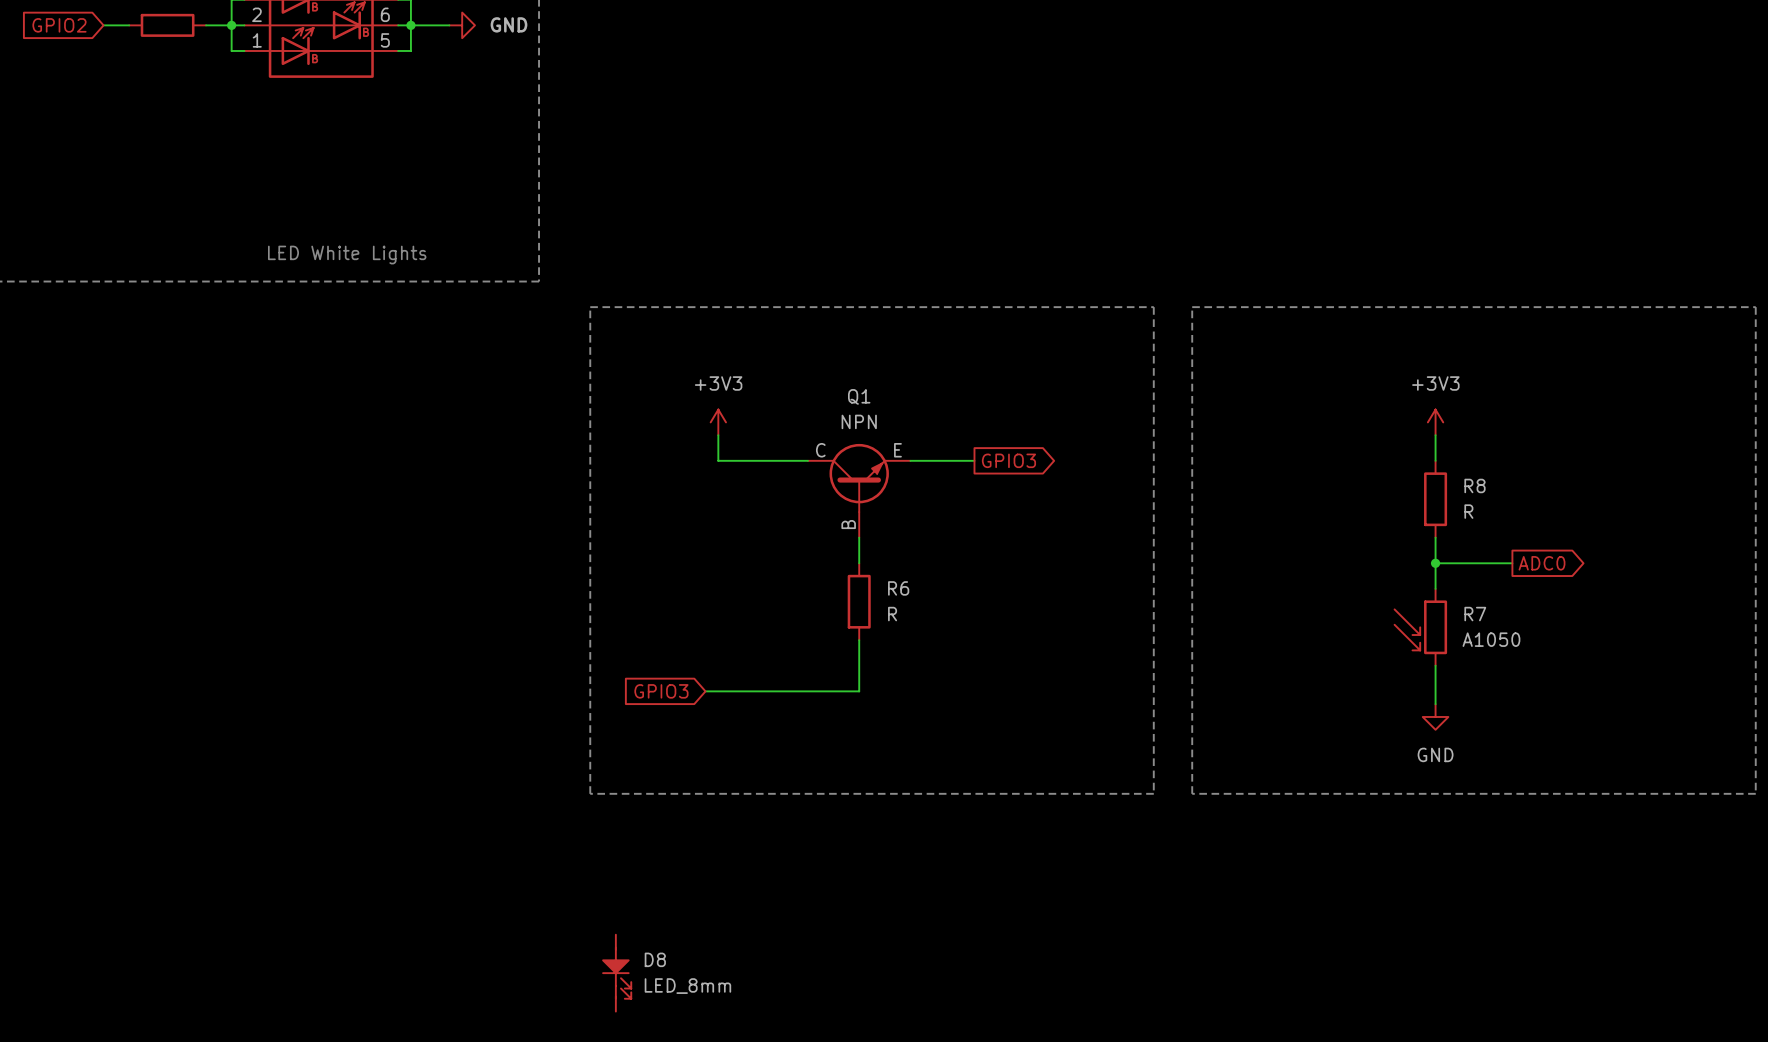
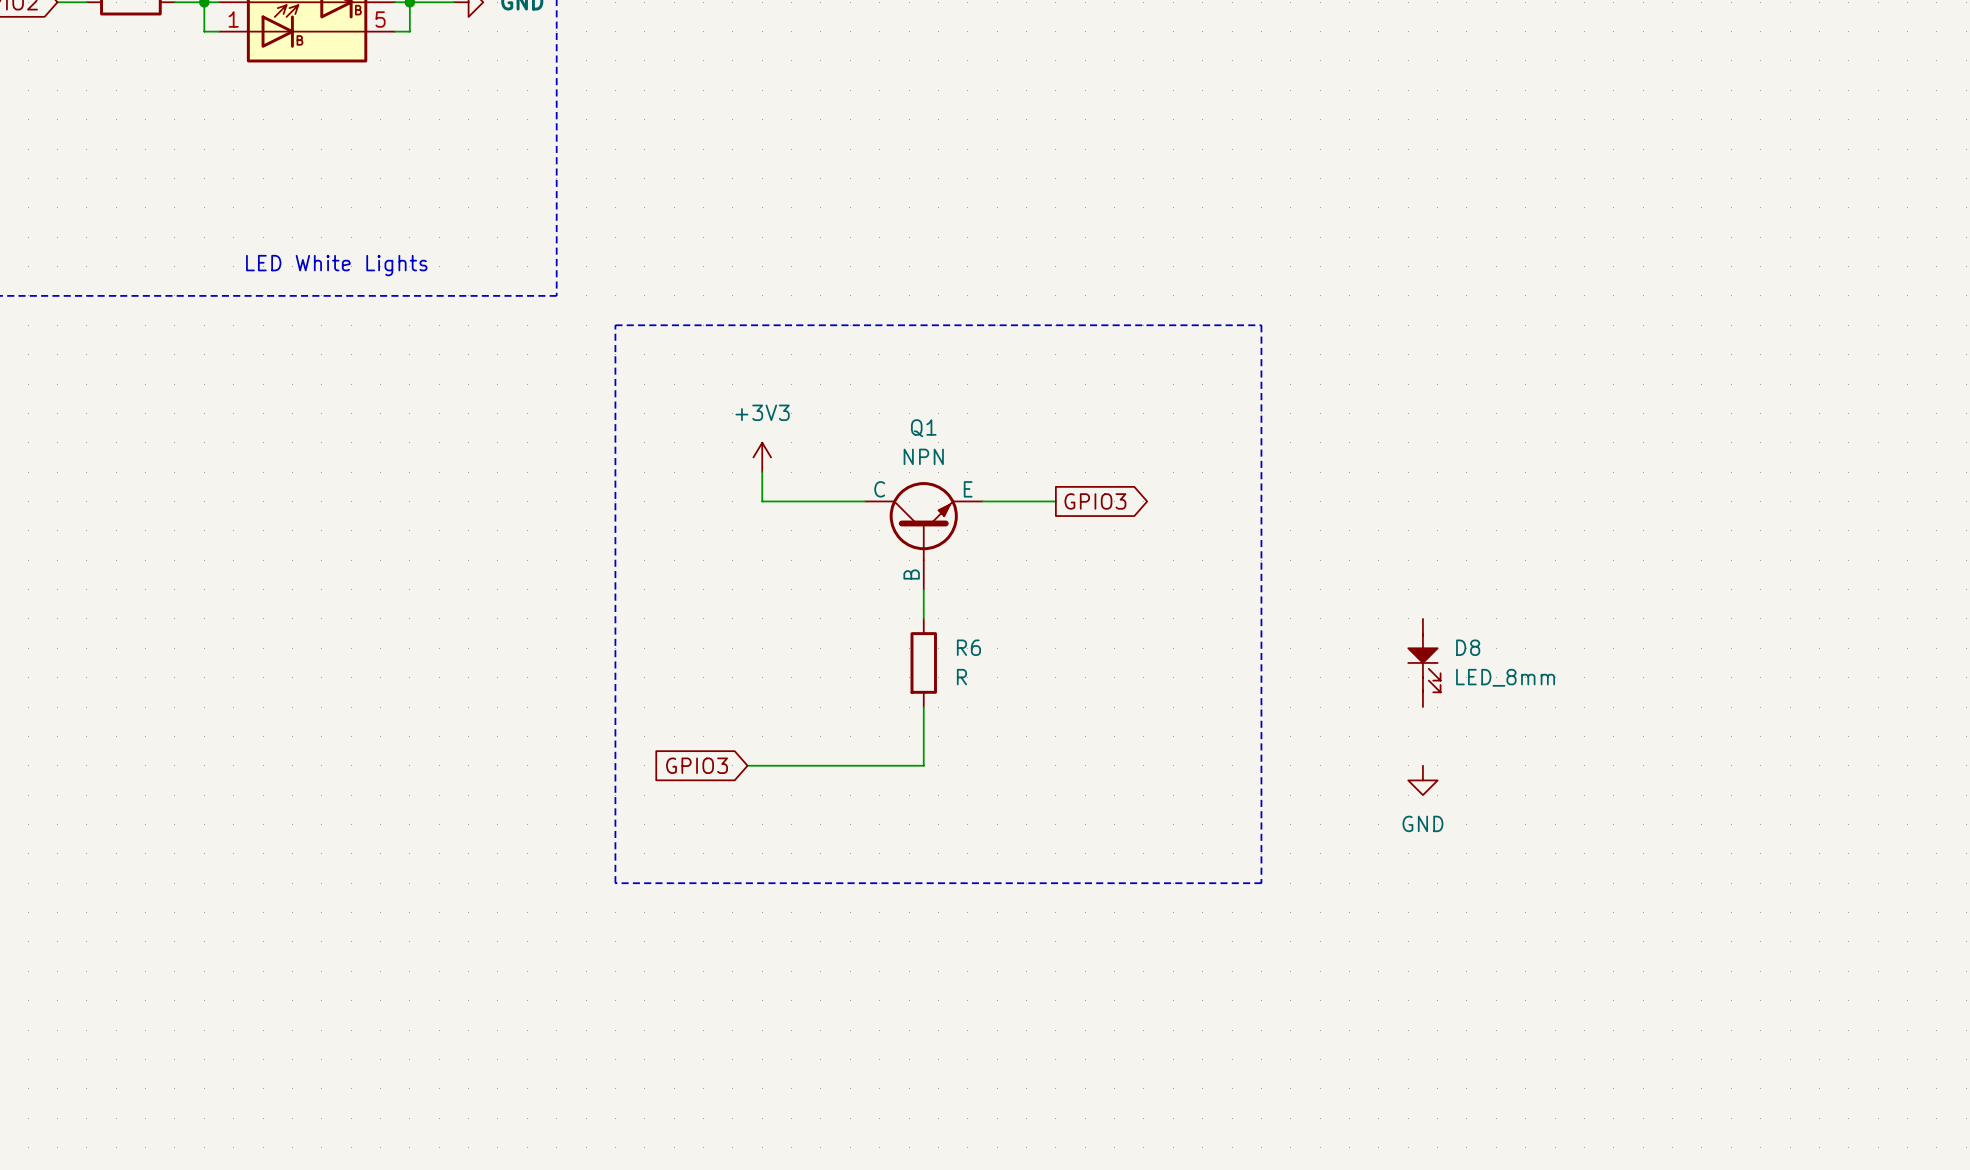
line: (1192, 307) (1755, 307) (1755, 793) (1192, 793) (1192, 307) -> none
power symbol: +3V3 (1435, 422) -> none
wire: (1435, 435) (1435, 460) -> none
R8: R (1435, 499) -> none
wire: (1435, 537) (1435, 588) -> none
wire: (1435, 563) (1512, 563) -> none
junction: (1435, 563) -> none
global label: ADC0 (1542, 563) -> none
R7: A1050 (1420, 627) -> none
wire: (1435, 665) (1435, 704) -> none
power symbol position: GND (1435, 716) -> GND (1422, 780)
D8 position: (617, 973) -> (1424, 662)

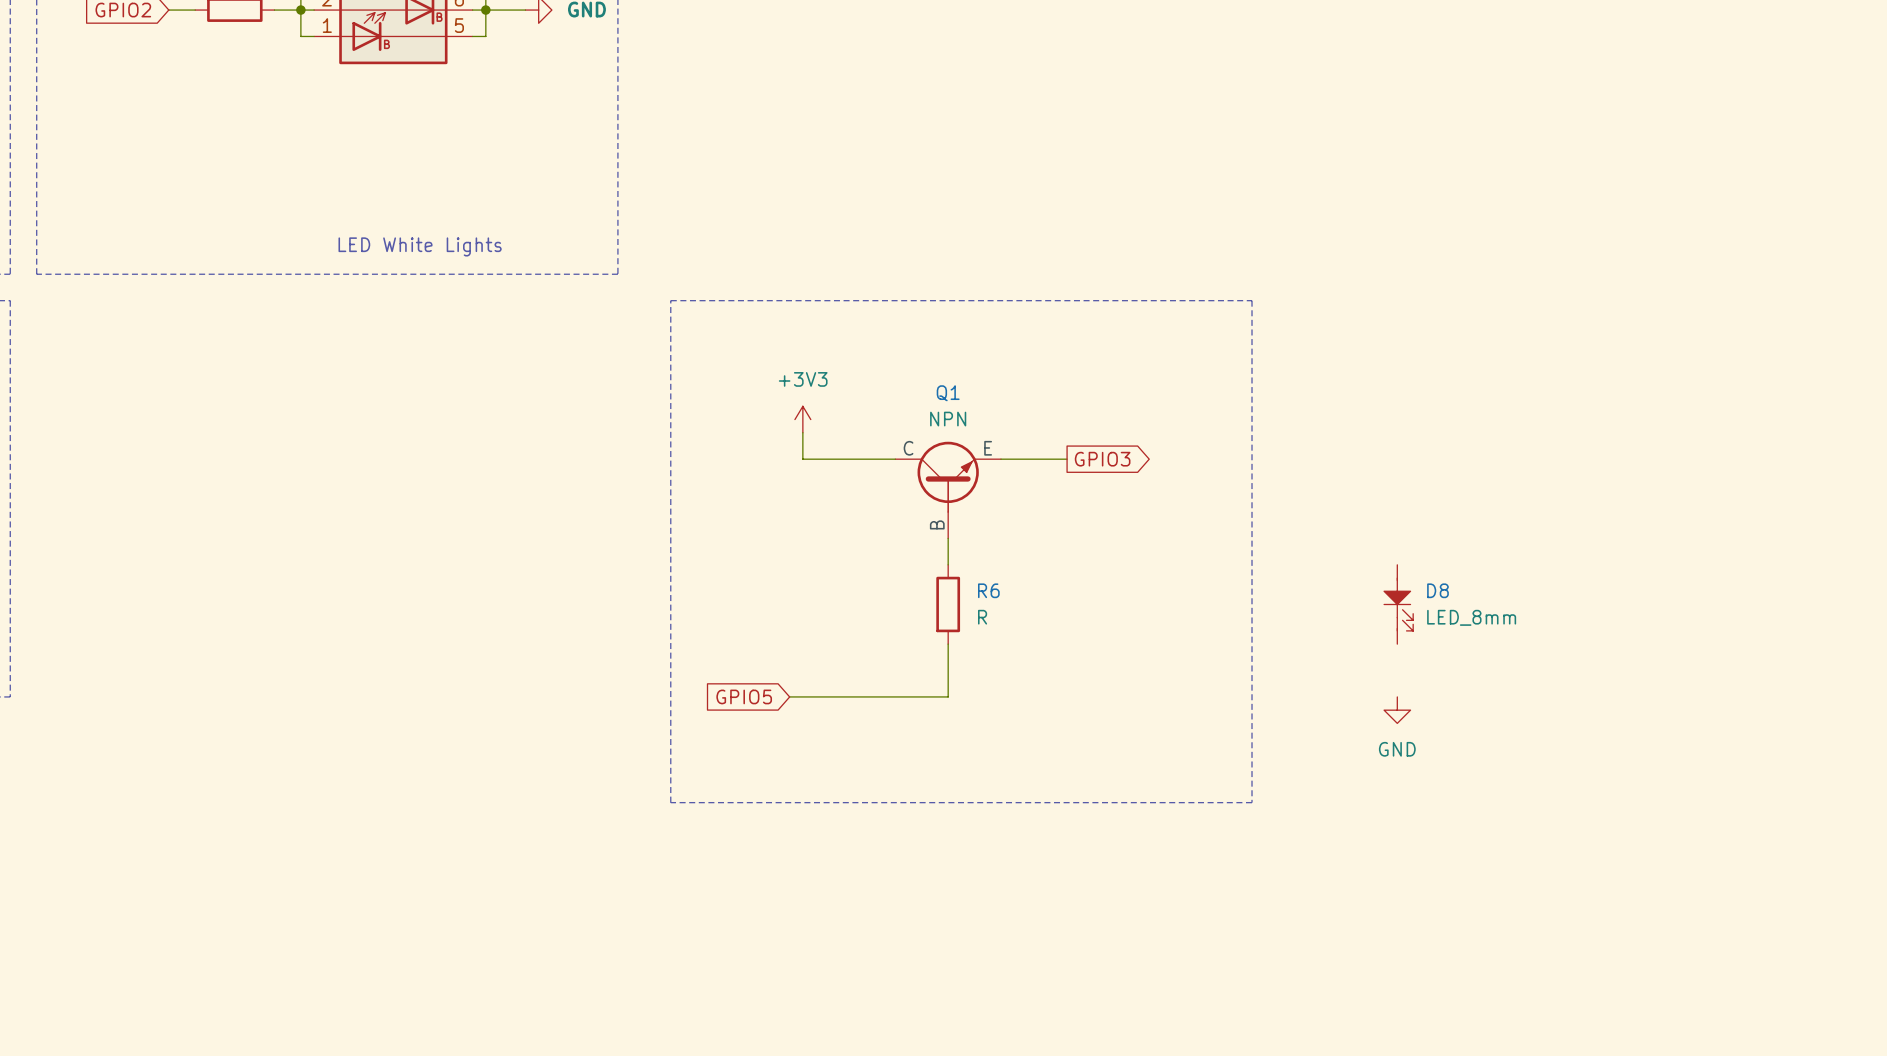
global label: GPIO3 (697, 765) -> GPIO5 (744, 696)

